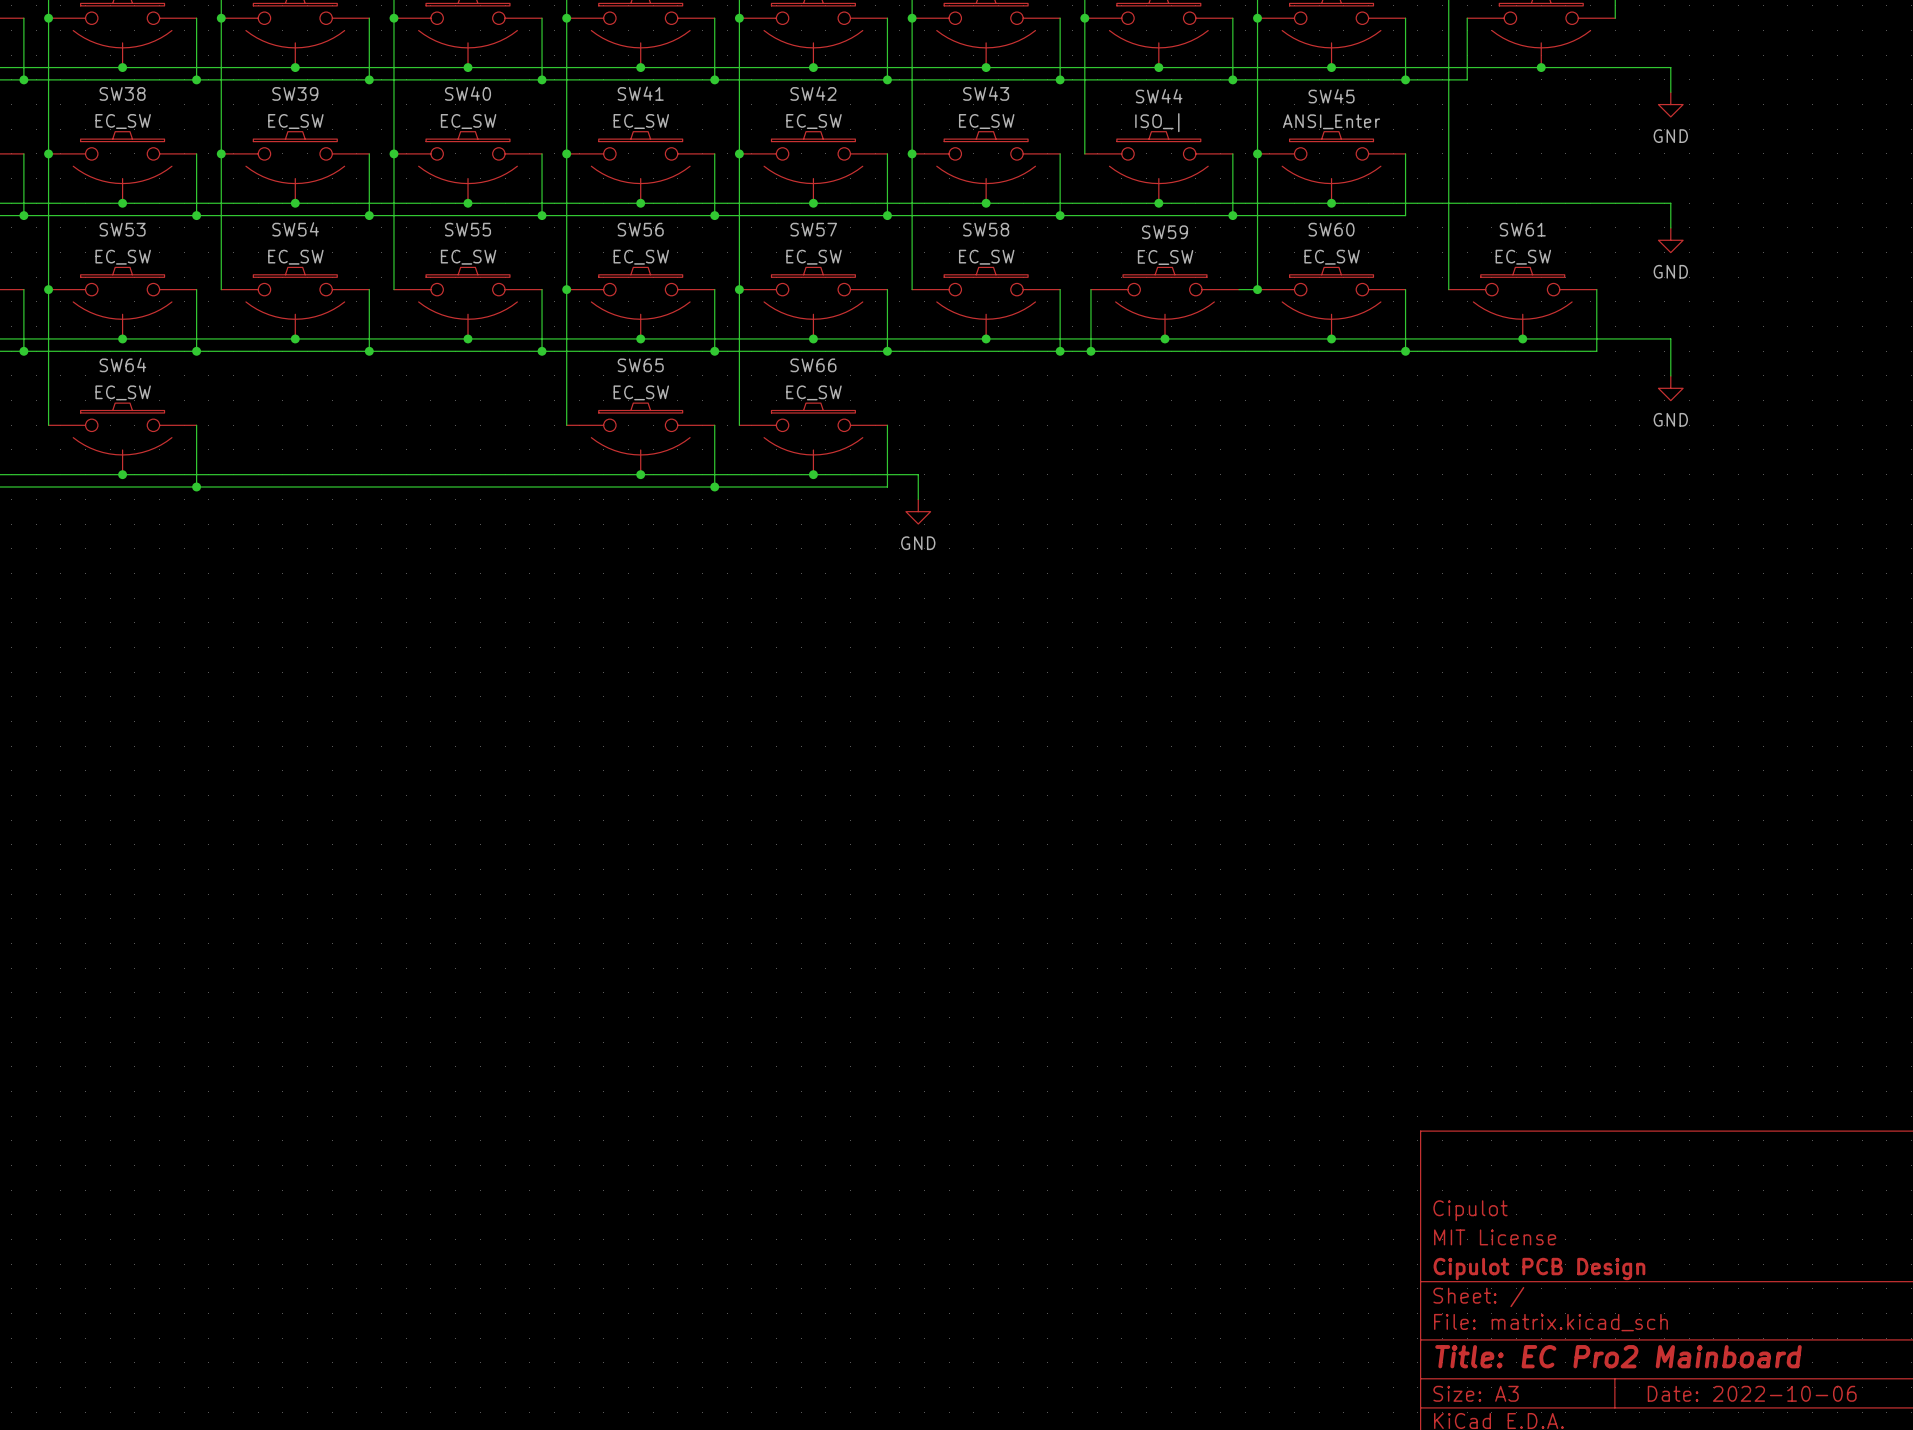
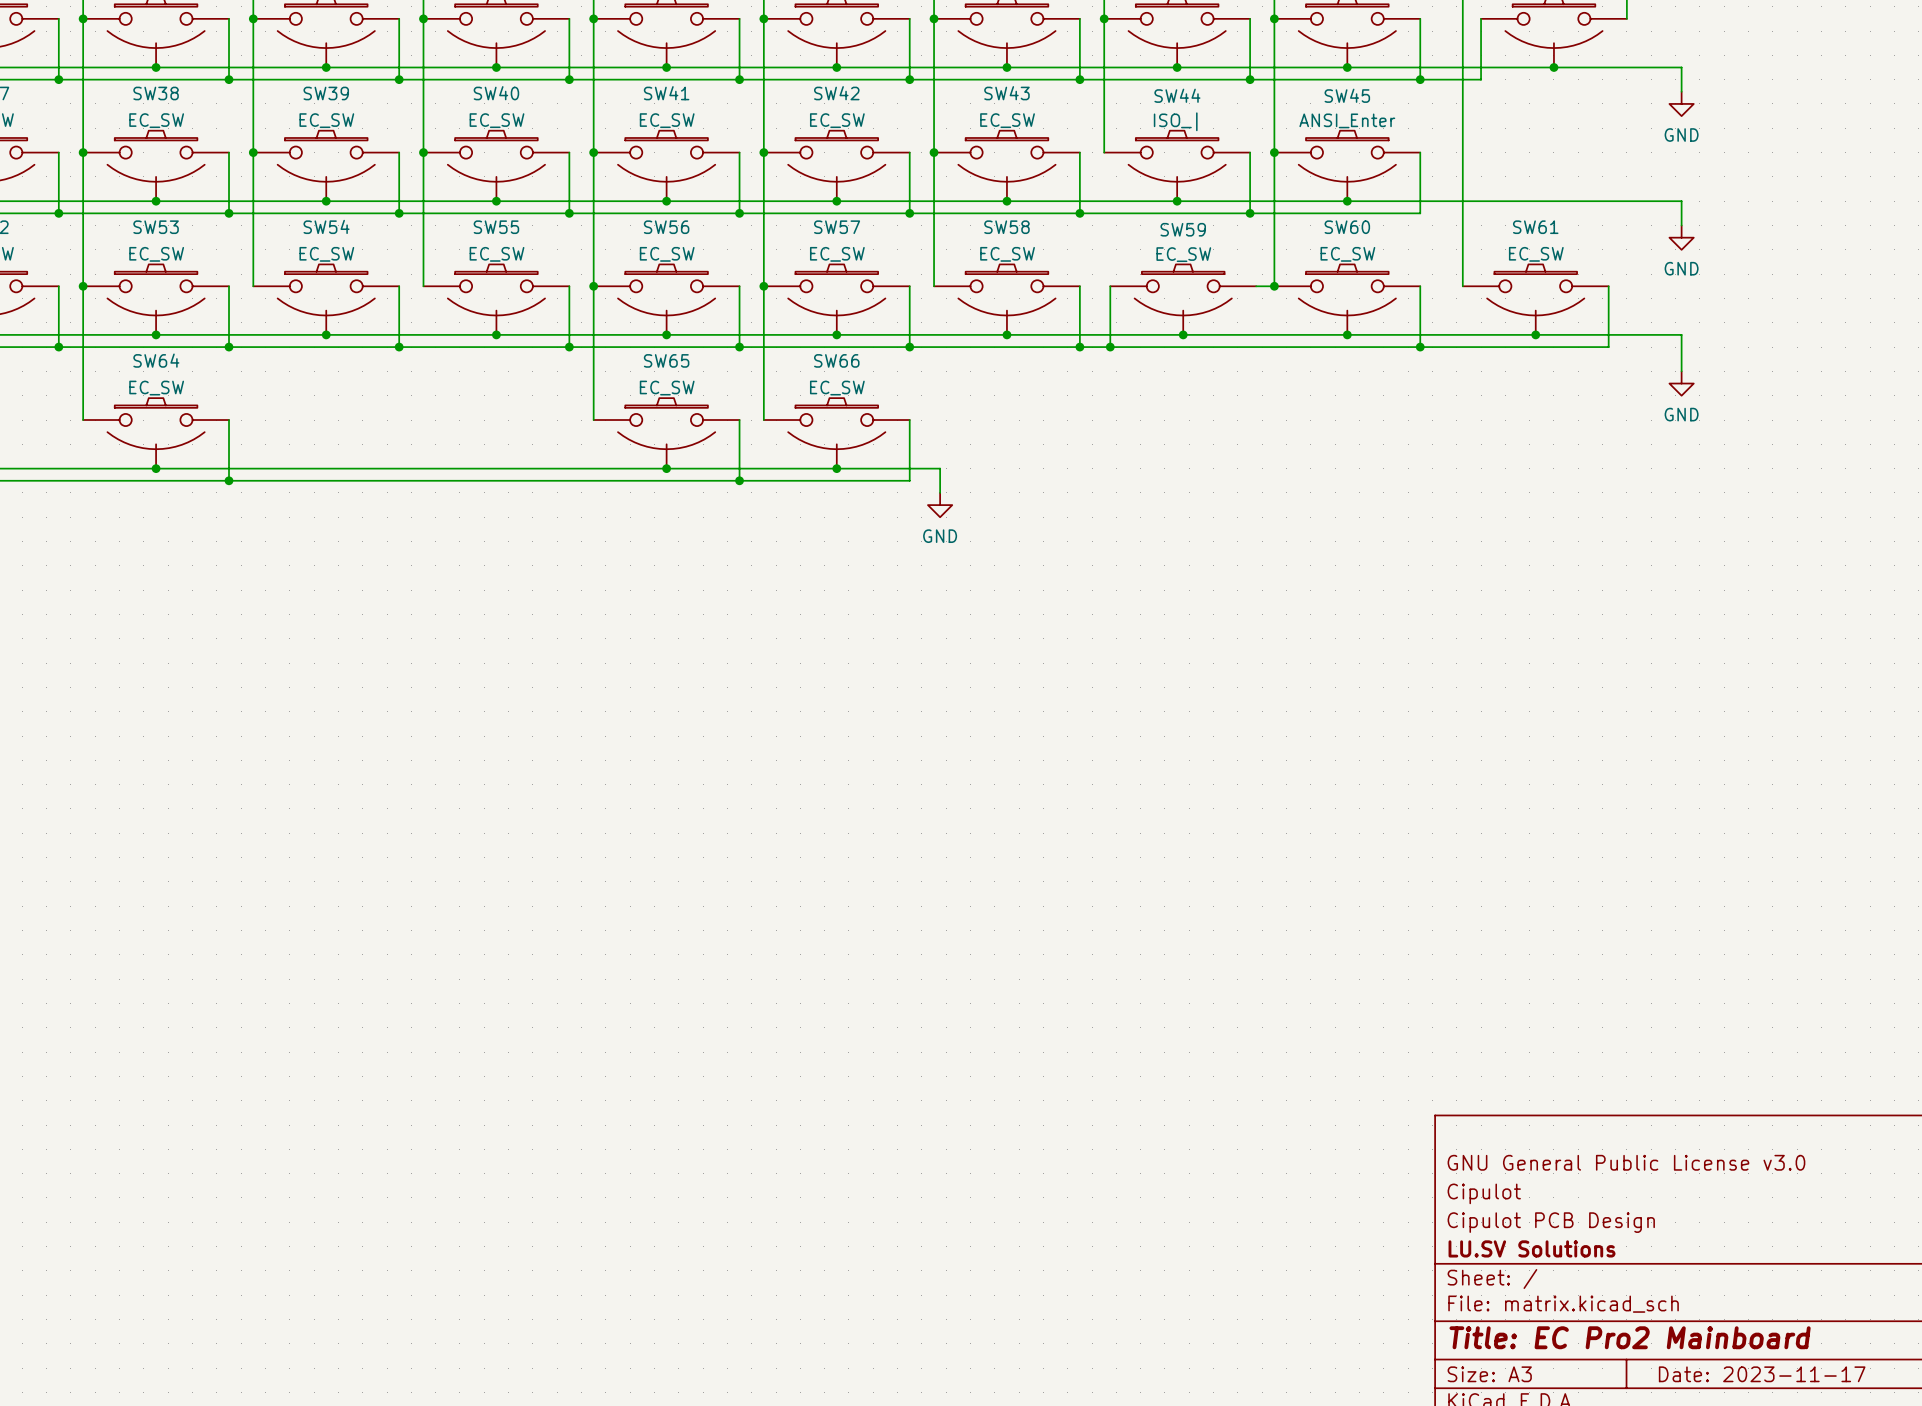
title block: none -> GNU General Public License v3.0 (1626, 1162)
title block: MIT License (1495, 1237) -> Cipulot PCB Design (1551, 1222)
title block: Cipulot PCB Design (1539, 1268) -> LU.SV Solutions (1532, 1248)
title block: Date: 2022-10-06 (1752, 1393) -> Date: 2023-11-17 (1762, 1374)

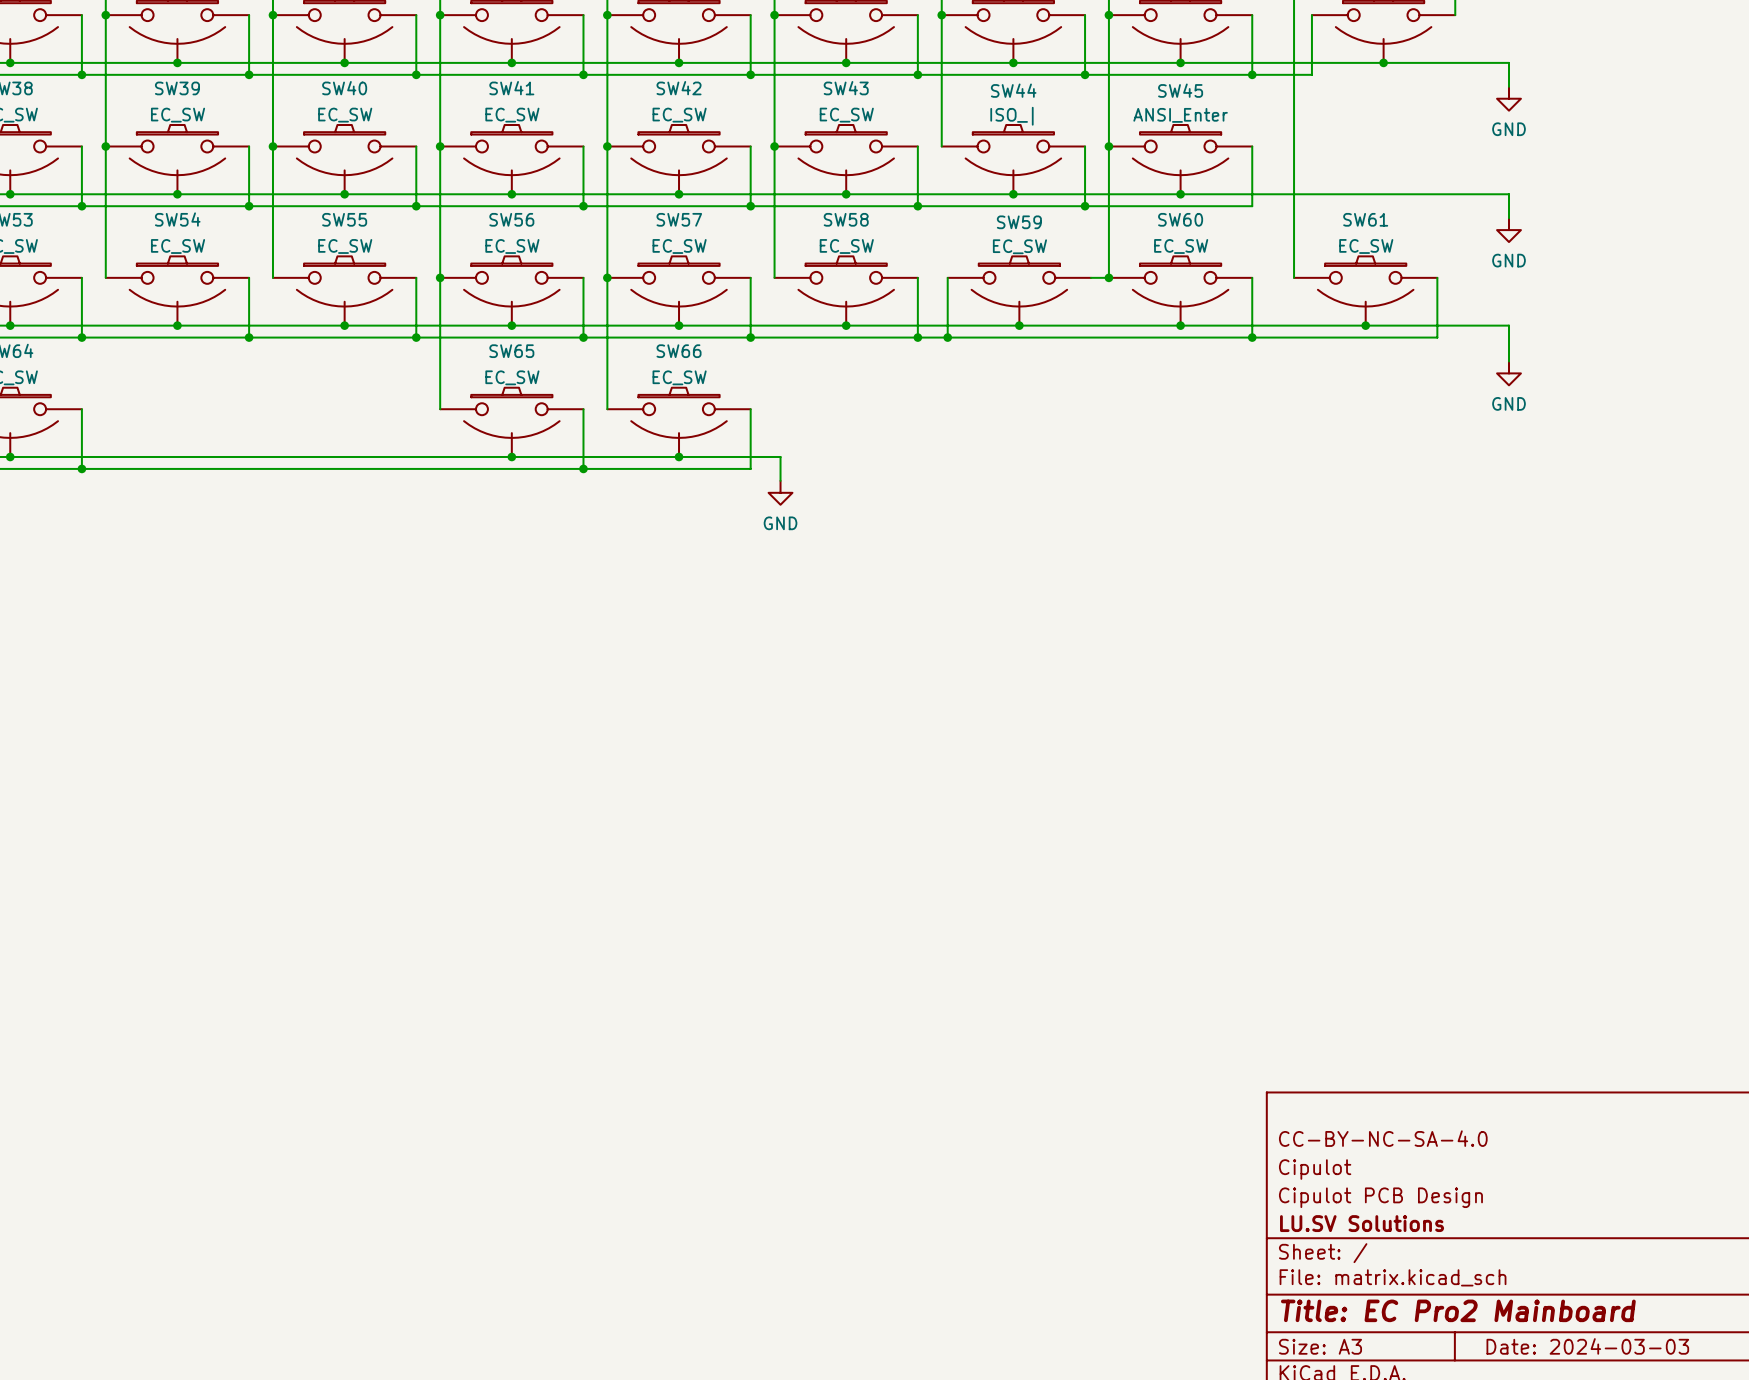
title block: GNU General Public License v3.0 (1626, 1162) -> CC-BY-NC-SA-4.0 (1383, 1138)
title block: Date: 2023-11-17 (1762, 1374) -> Date: 2024-03-03 (1587, 1346)

